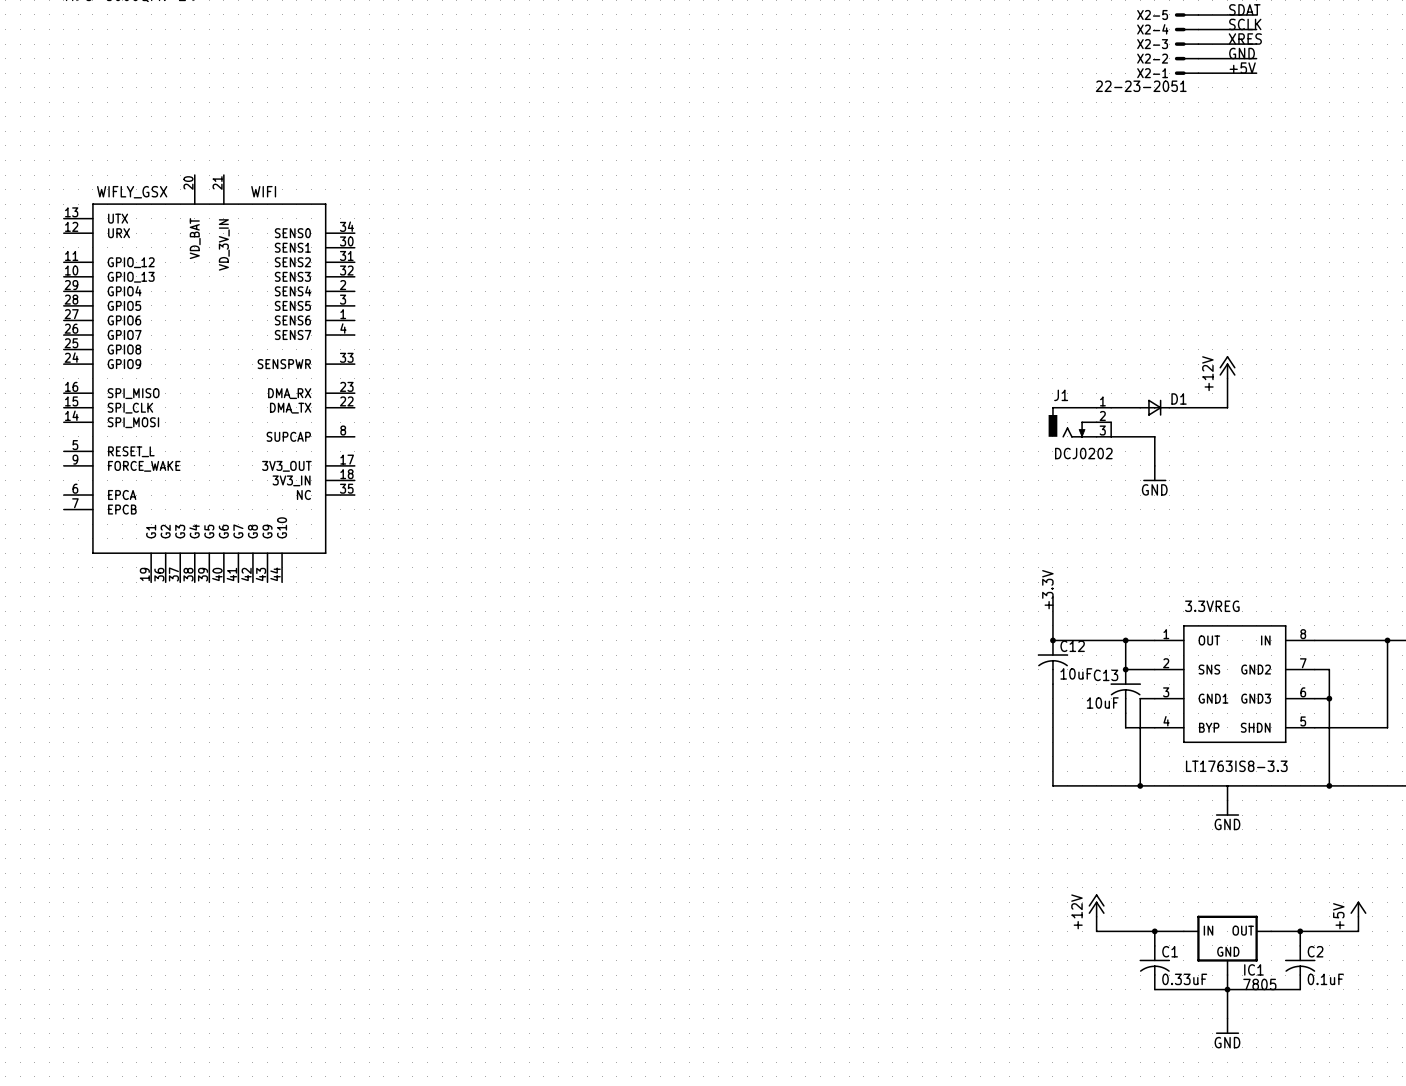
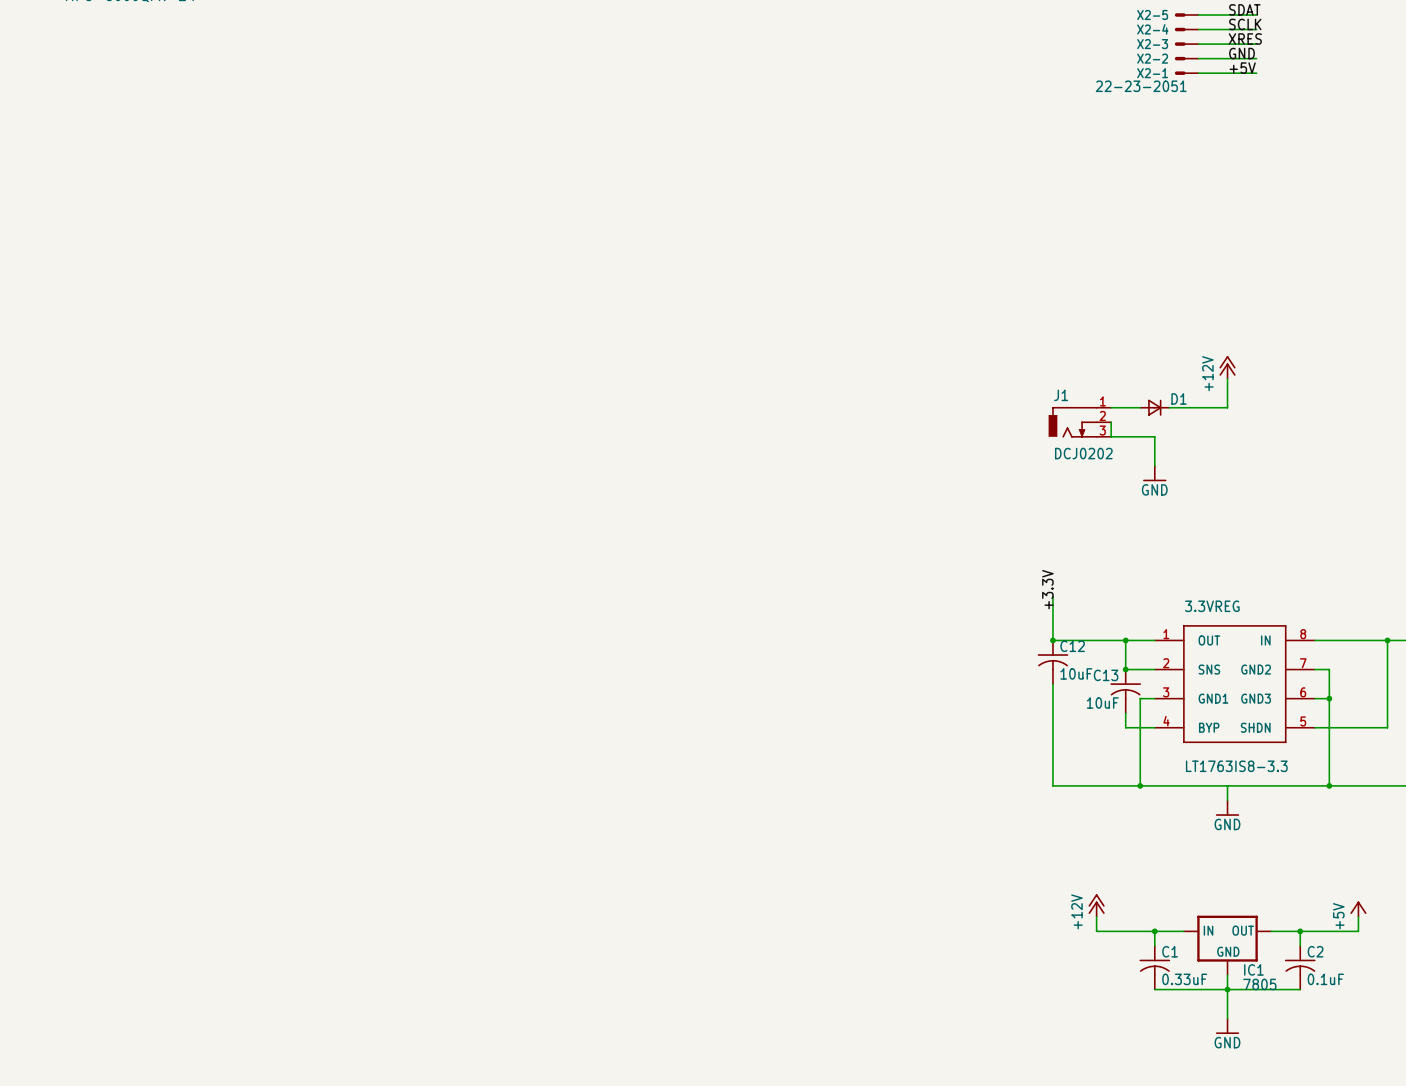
WIFI: WIFLY_GSX (209, 378) -> none

